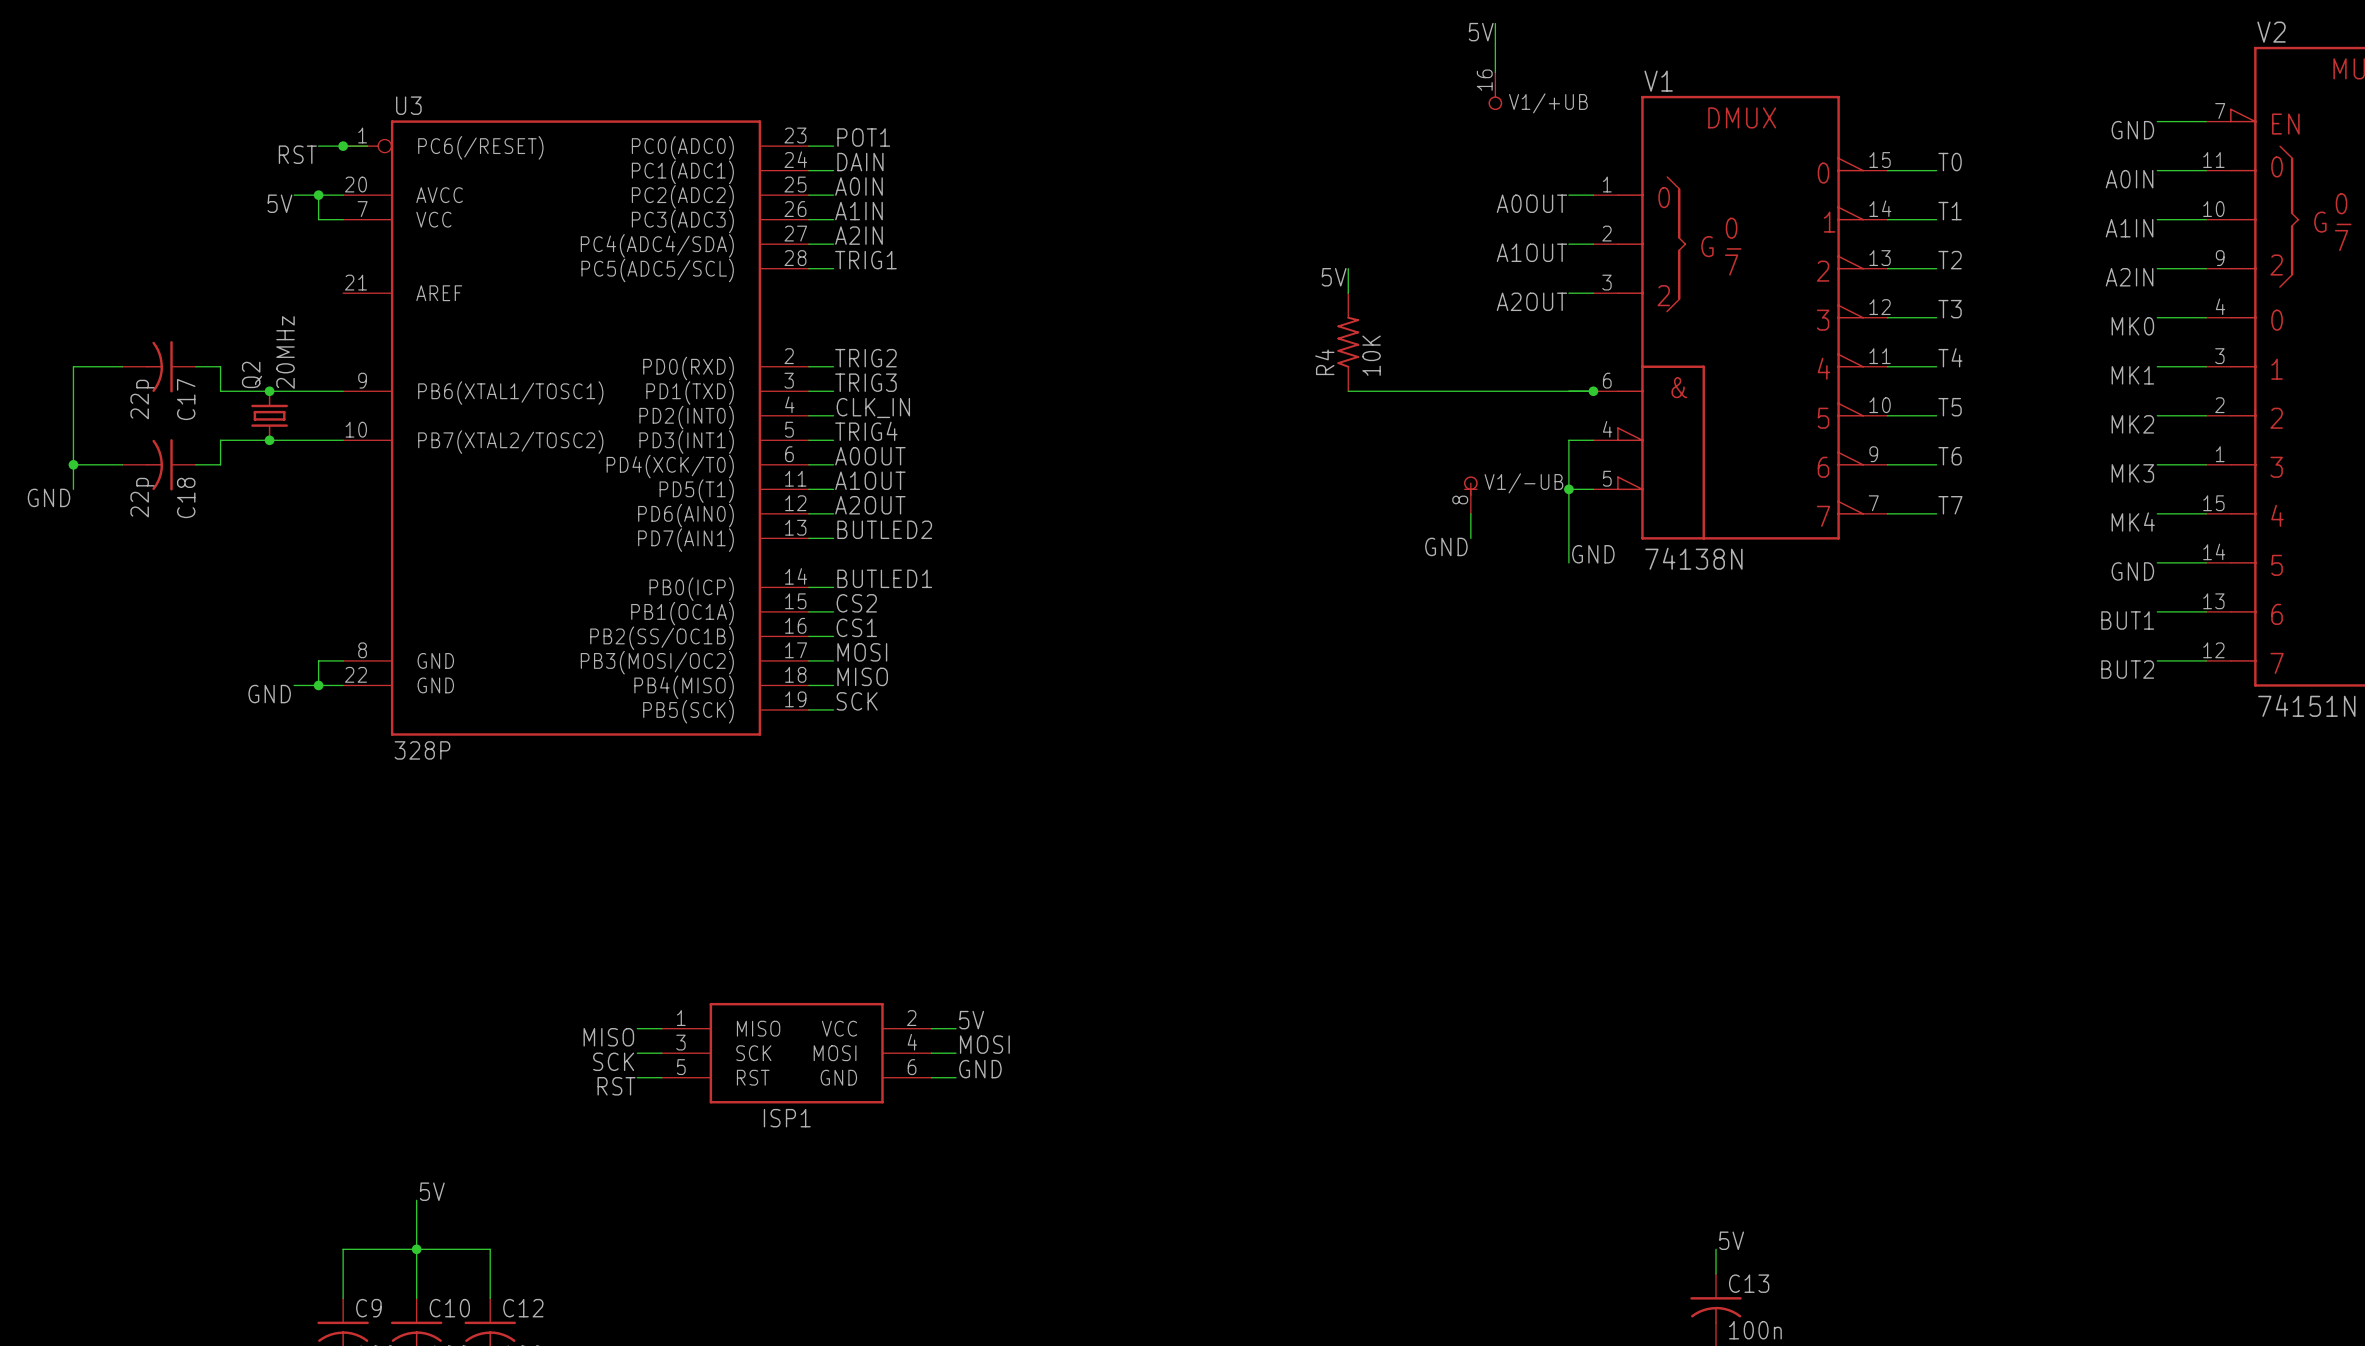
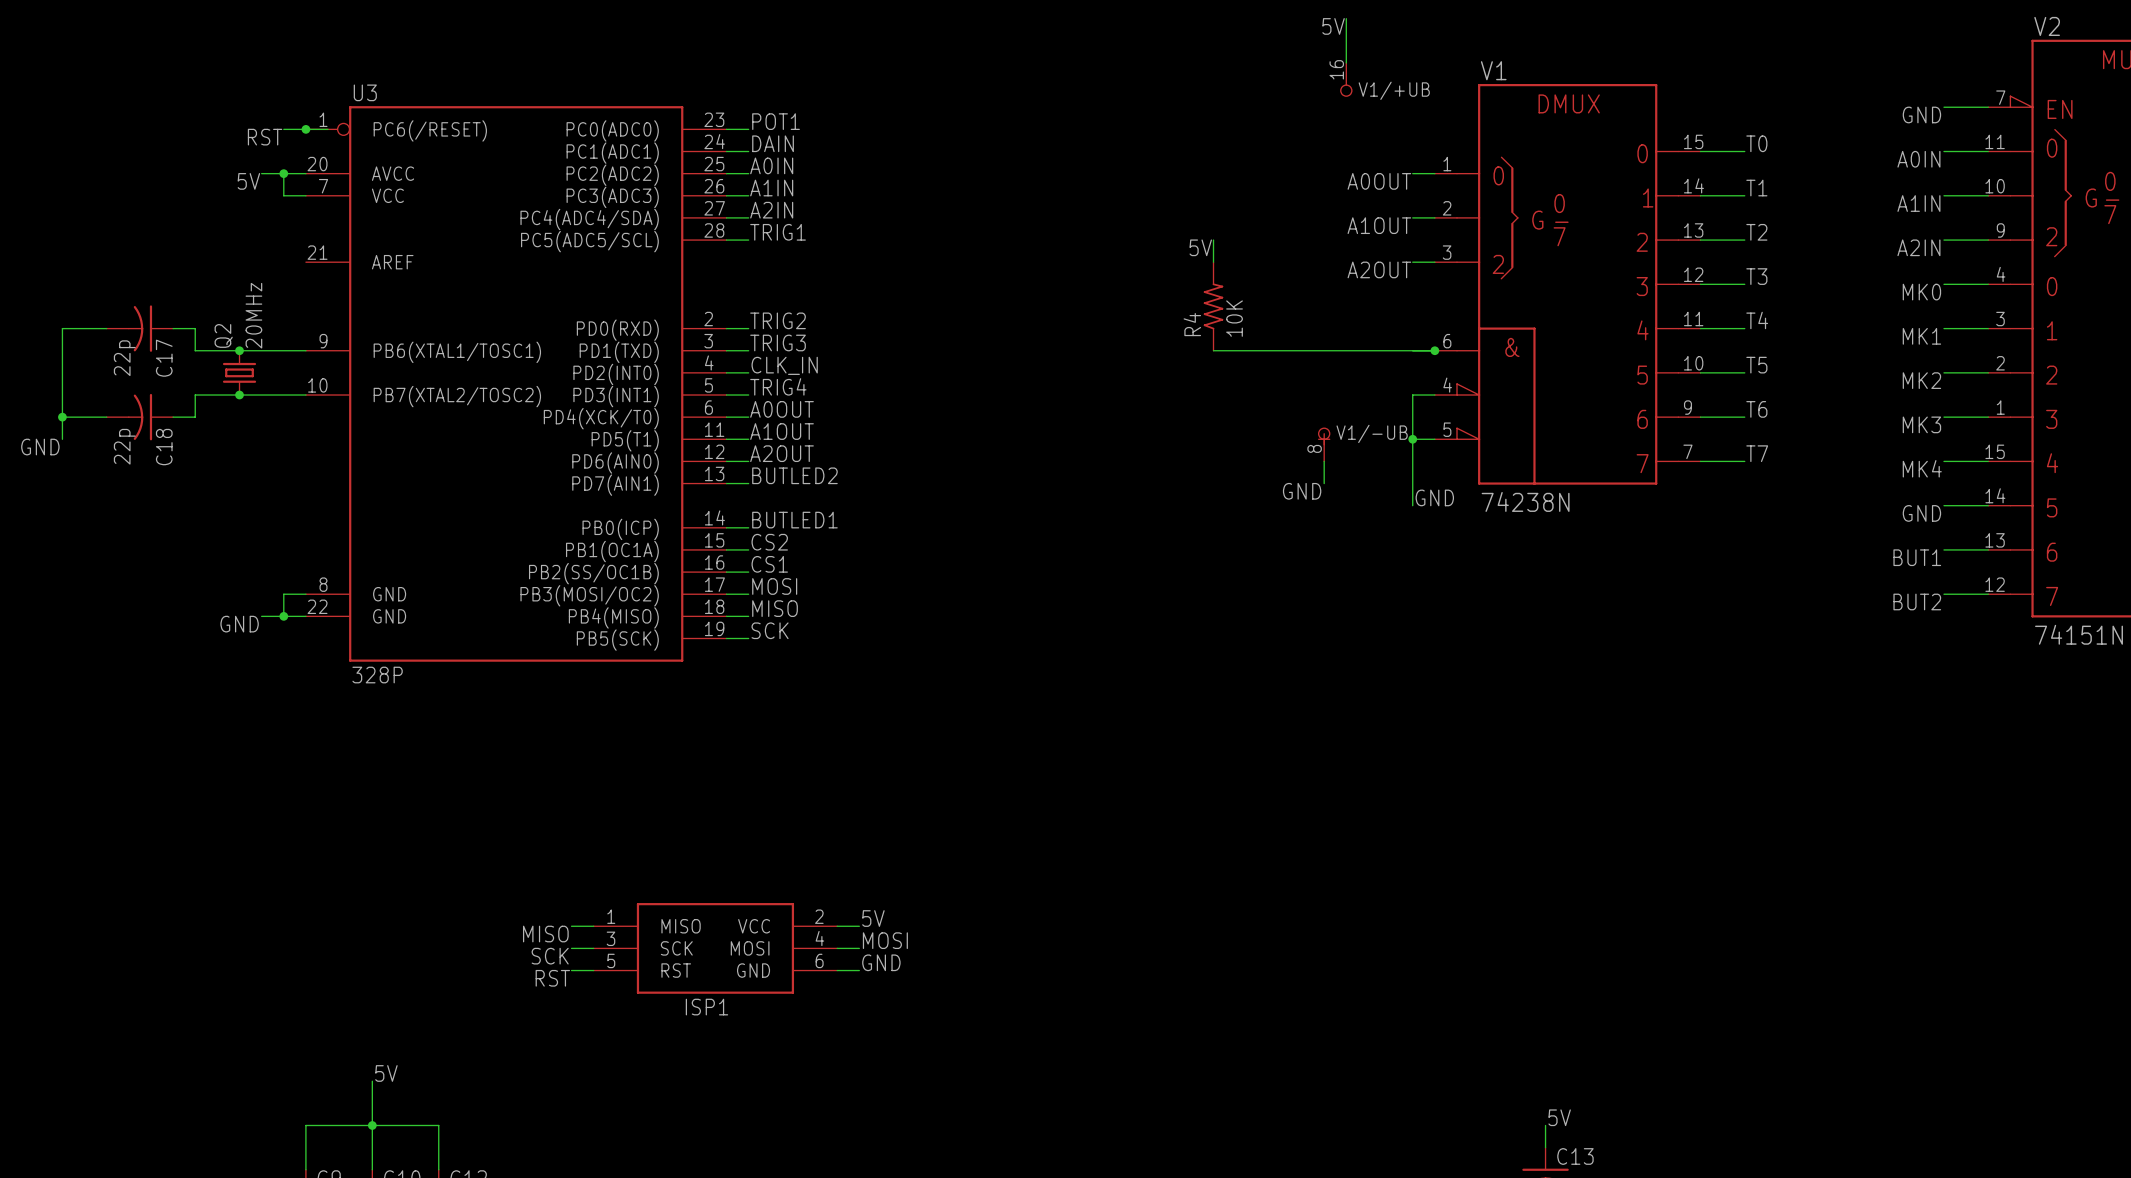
V1 symbol: [1593, 95, 1888, 540] -> [1434, 83, 1701, 485]
V1 value: 74138N (1693, 558) -> 74238N (1525, 501)

